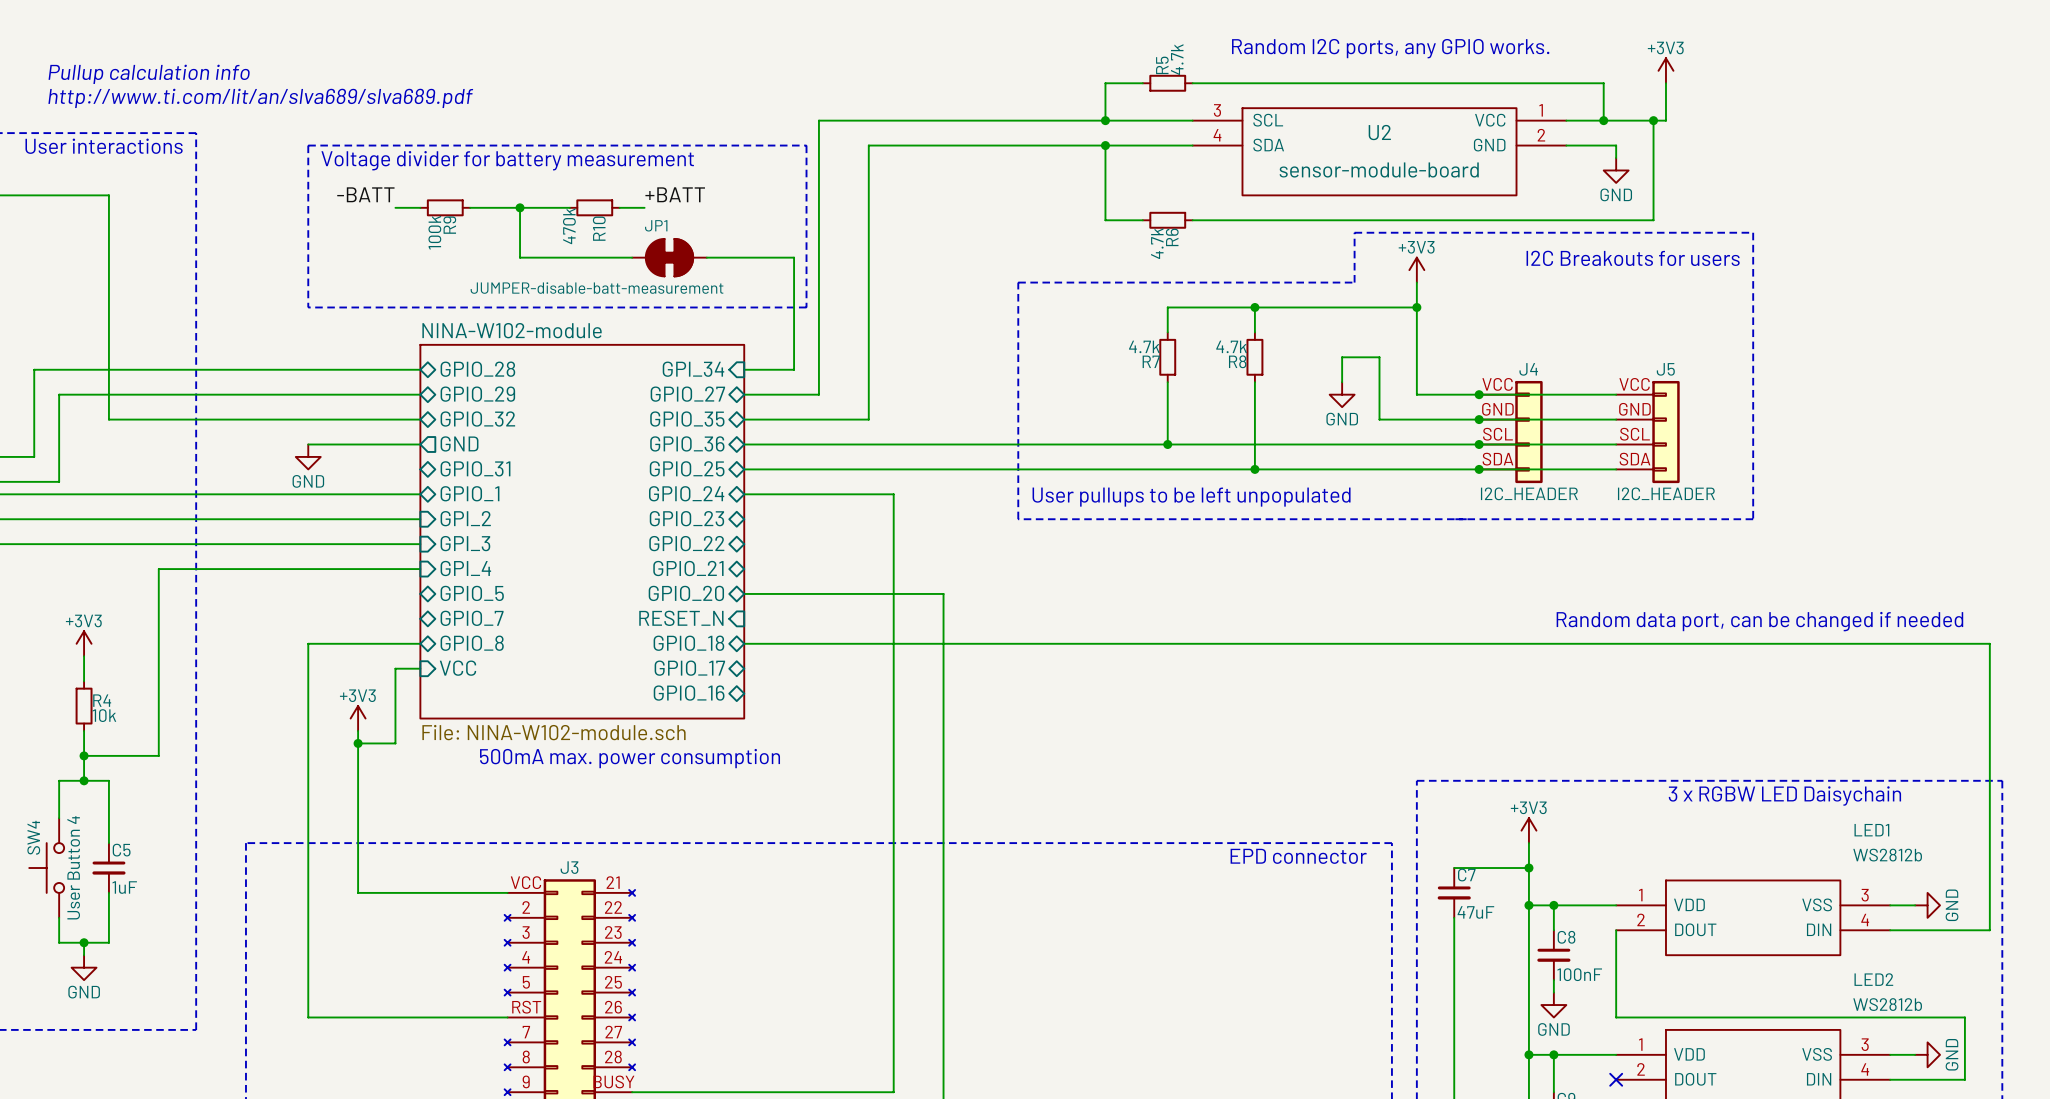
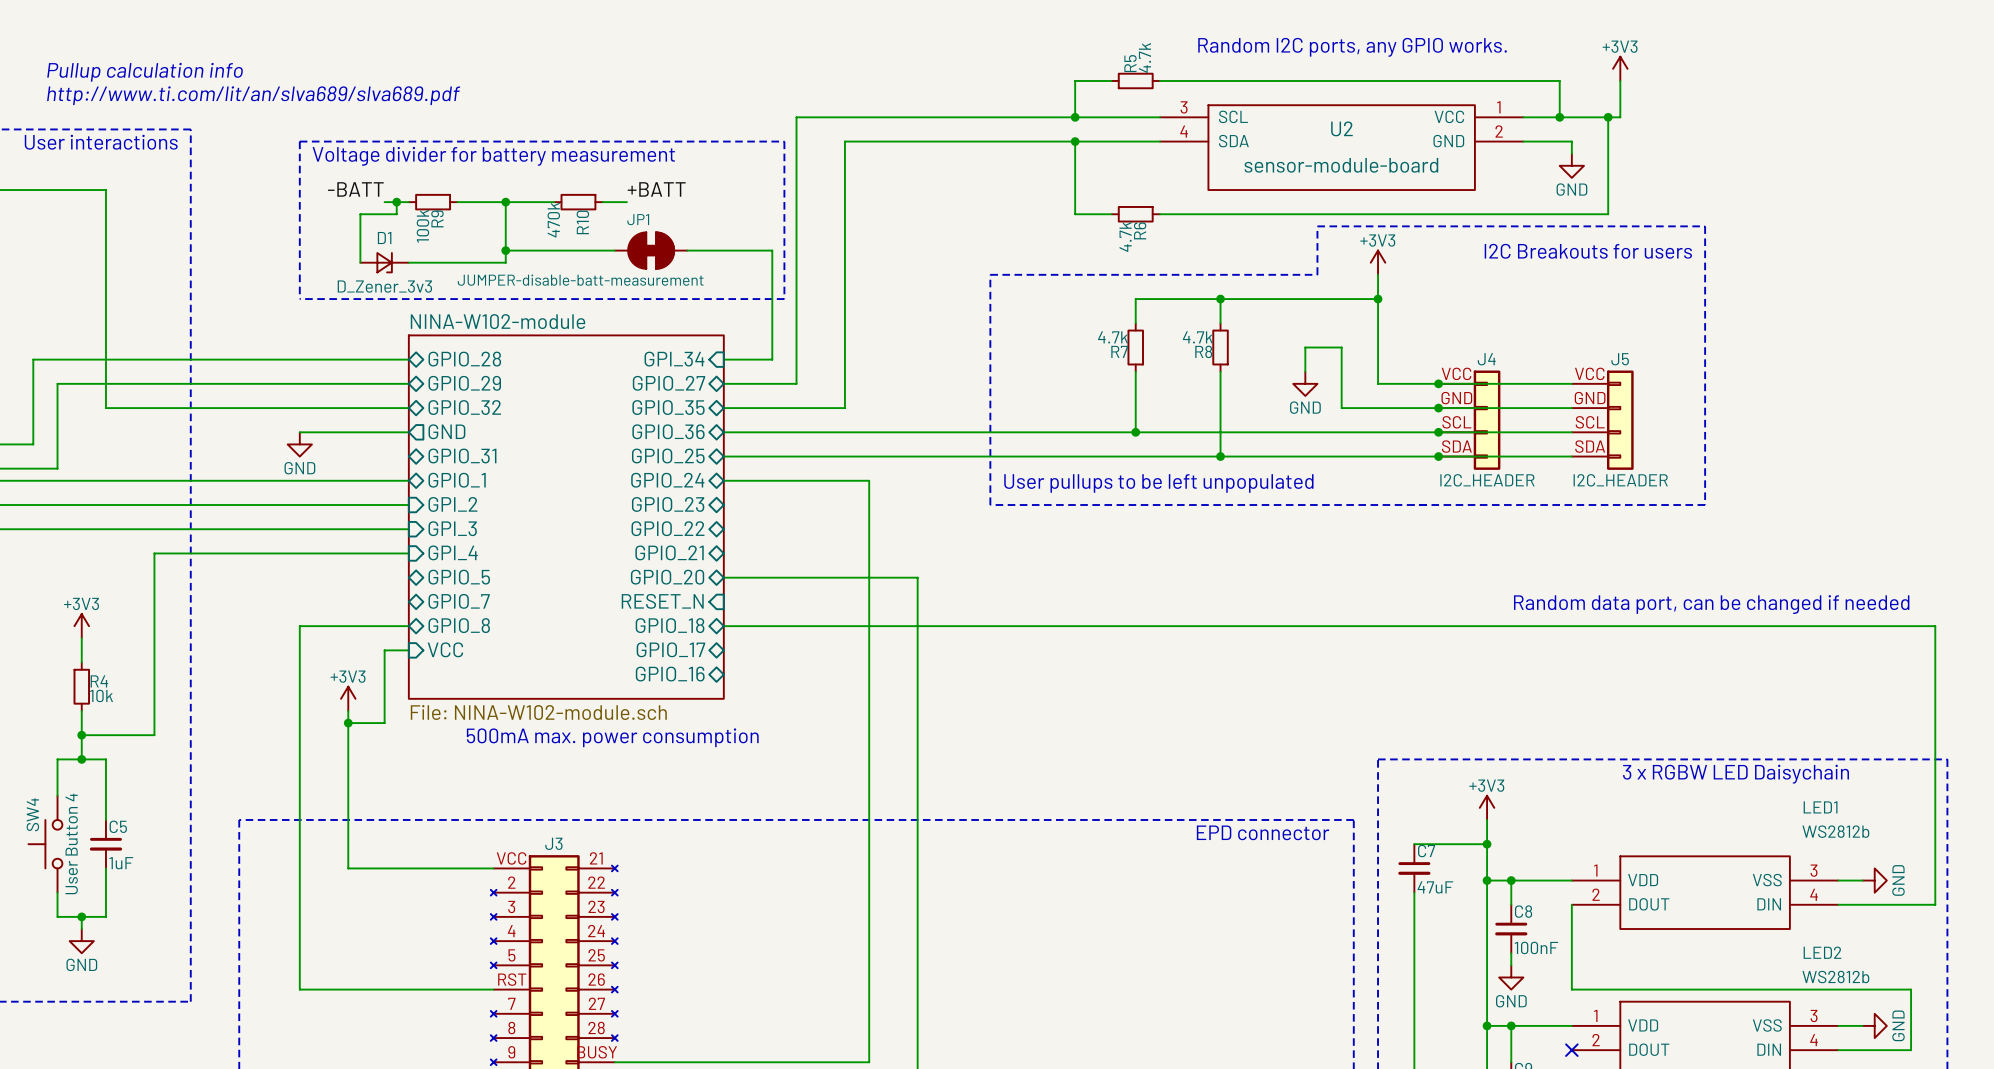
wire: none -> (396, 202) (396, 214) (360, 214) (360, 262)
junction: none -> (396, 202)
wire: none -> (505, 250) (505, 262) (408, 262)
junction: none -> (505, 250)
D1: none -> D_Zener_3v3 (384, 262)

